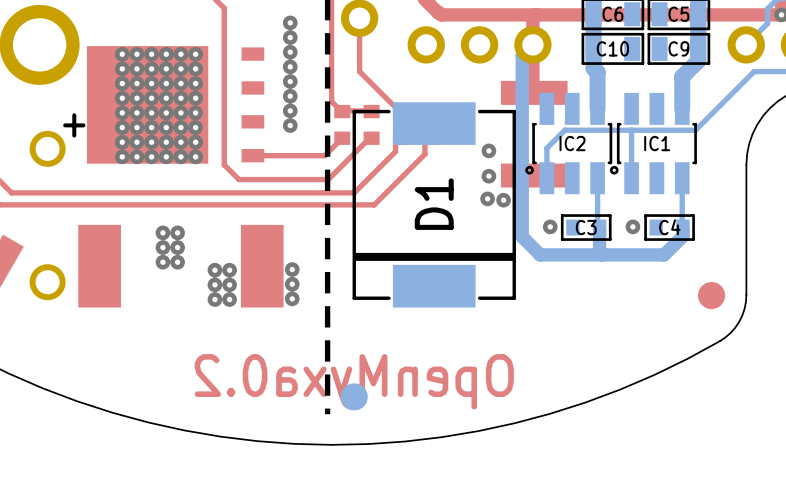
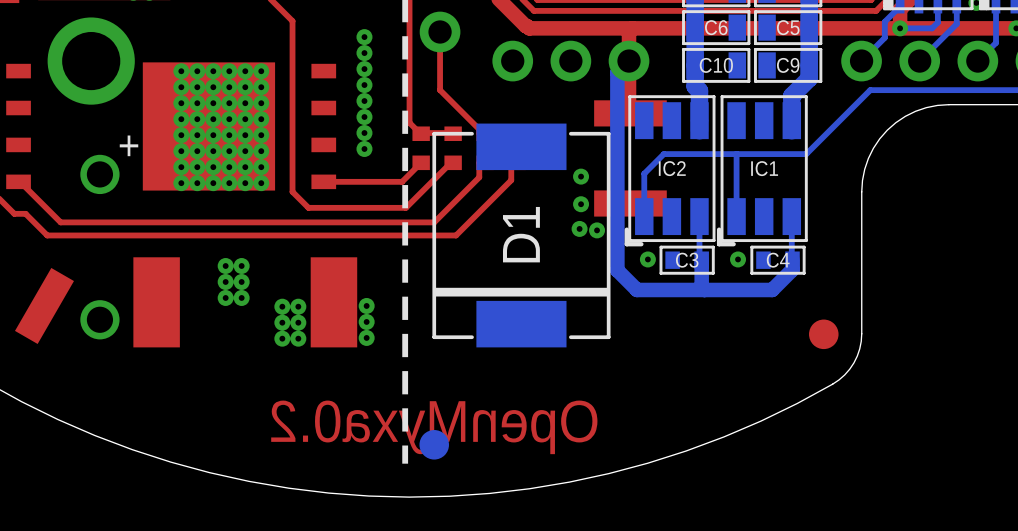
IC2 footprint: [525, 92, 613, 195] -> [624, 95, 716, 247]
IC1 footprint: [609, 92, 697, 195] -> [716, 95, 808, 247]

